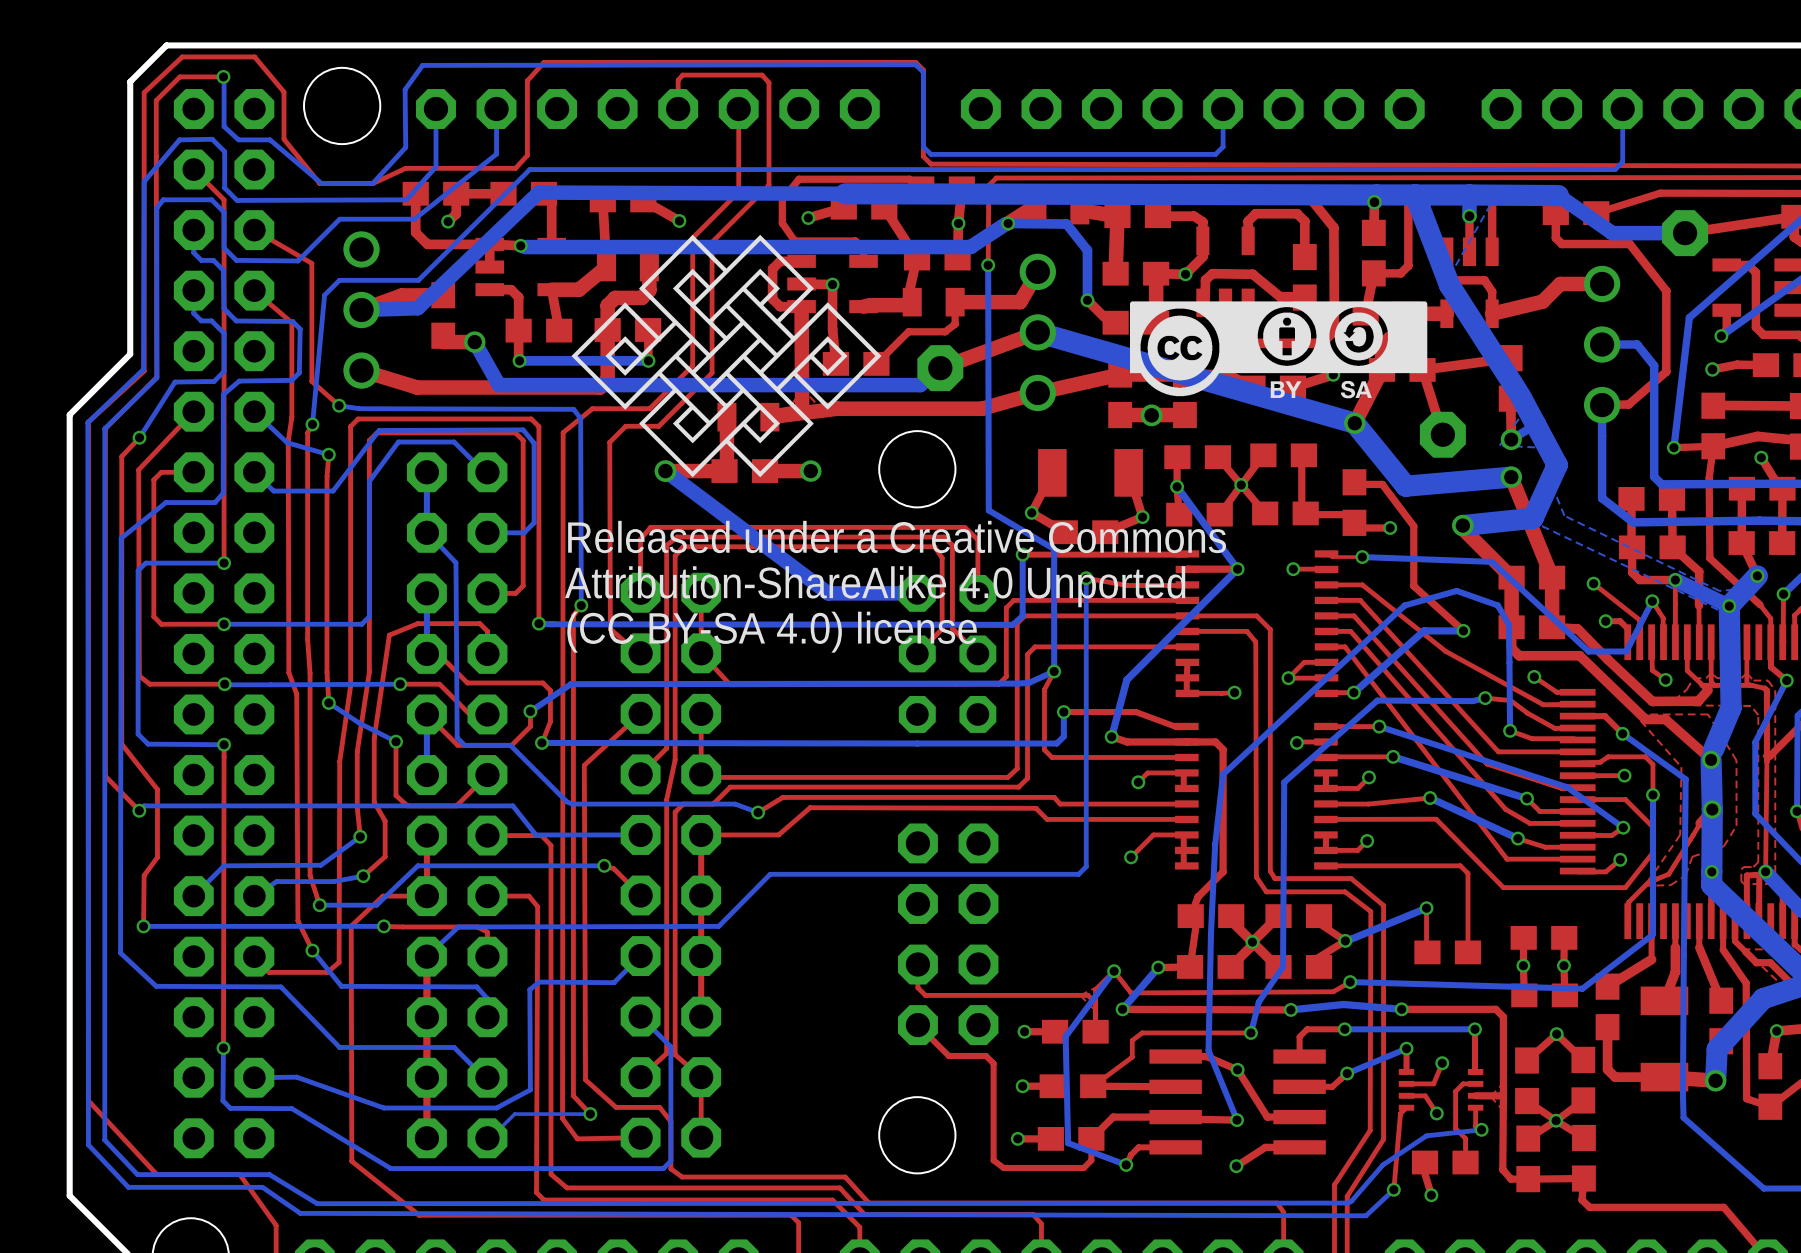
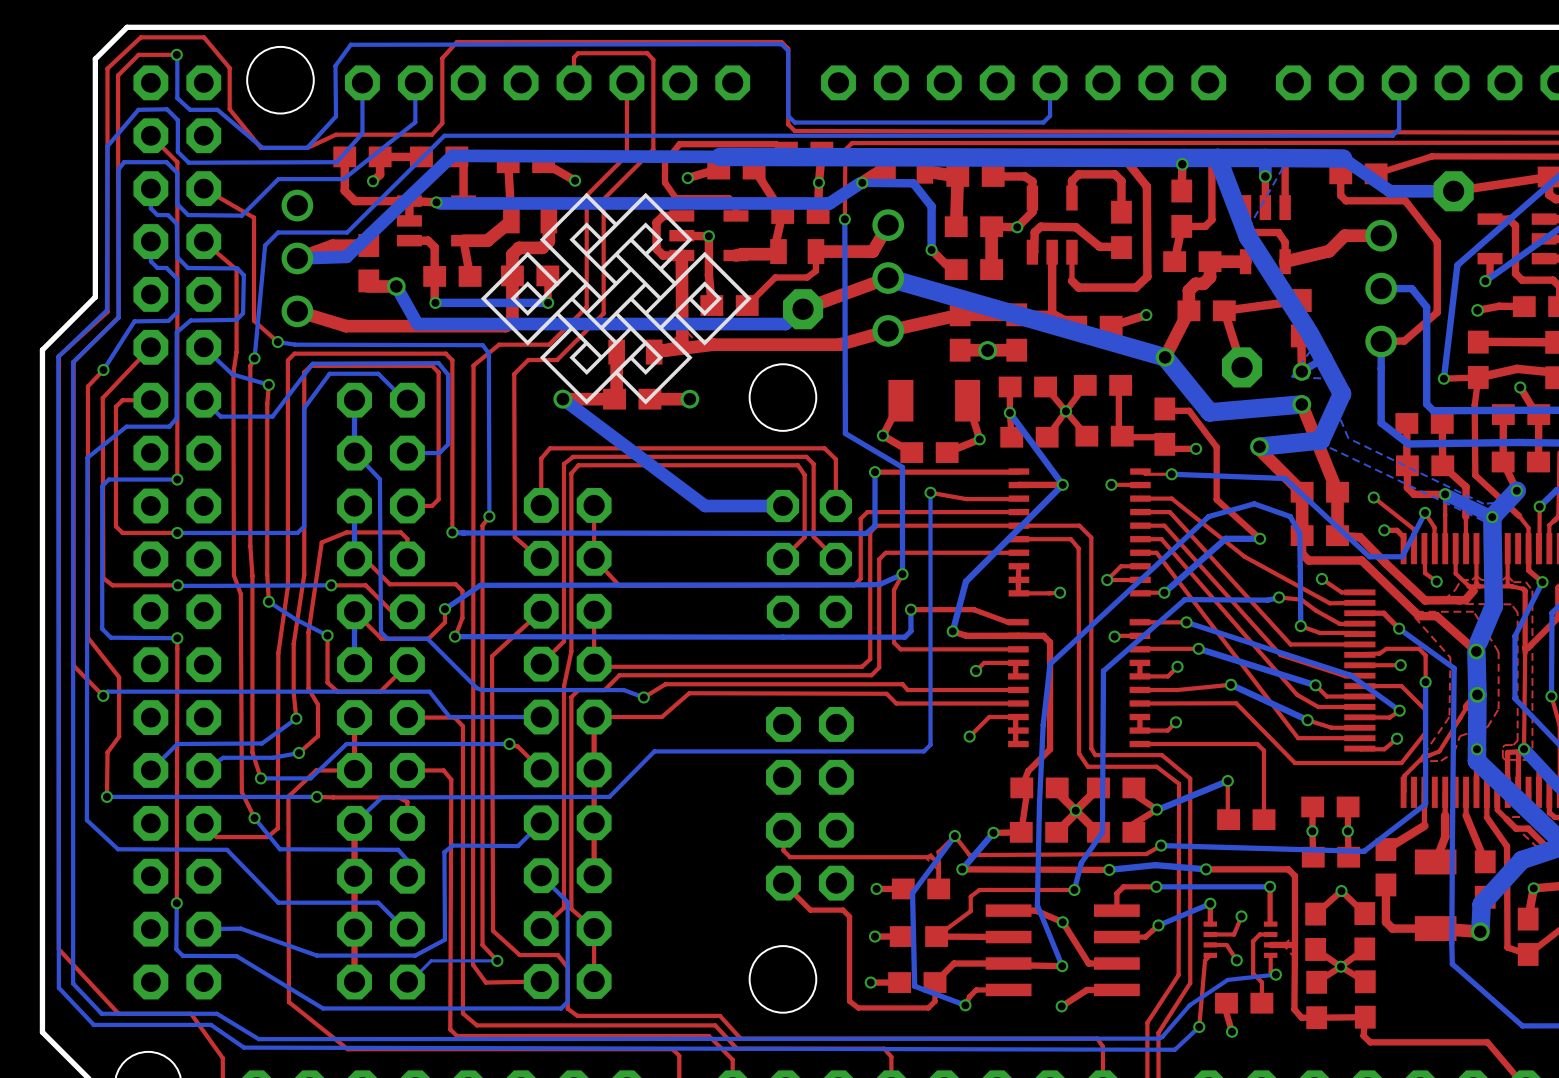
drawing: [1130, 301, 1428, 399] -> none
text: Released under a Creative Commons (897, 536) -> none
text: Attribution-ShareAlike 4.0 Unported (875, 586) -> none
text: (CC BY-SA 4.0) license (772, 632) -> none

